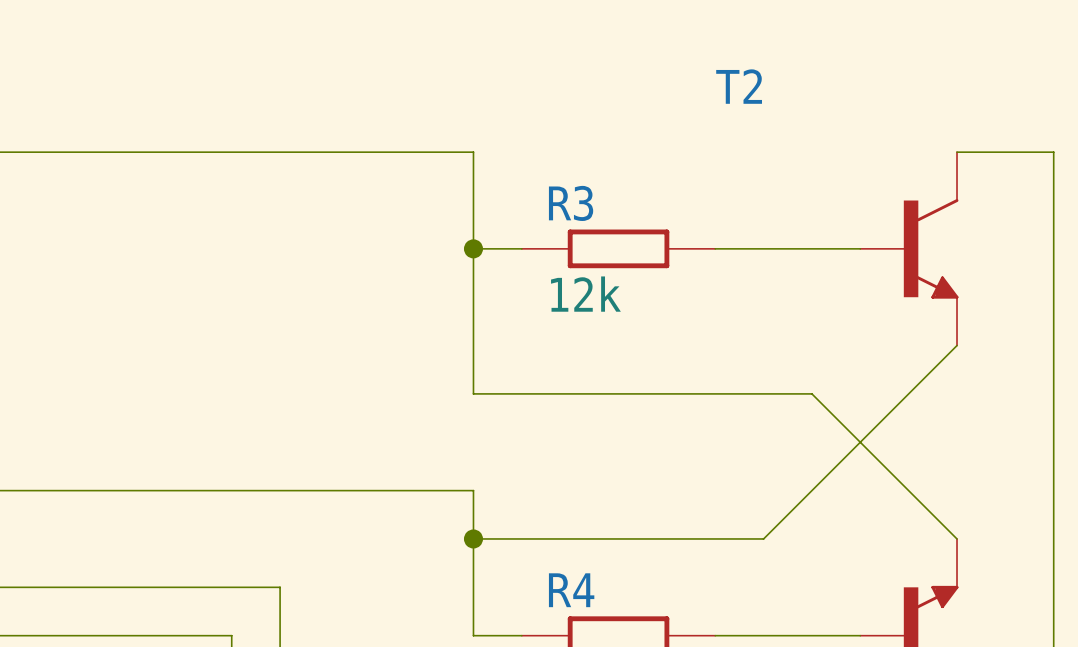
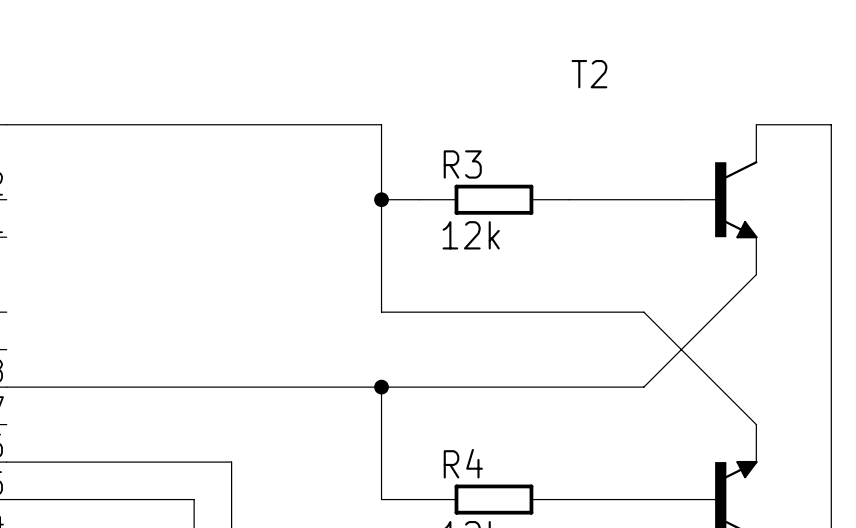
wire: (811, 490) (763, 538) (473, 538) -> (643, 387) (381, 387)
junction position: (473, 538) -> (381, 387)

